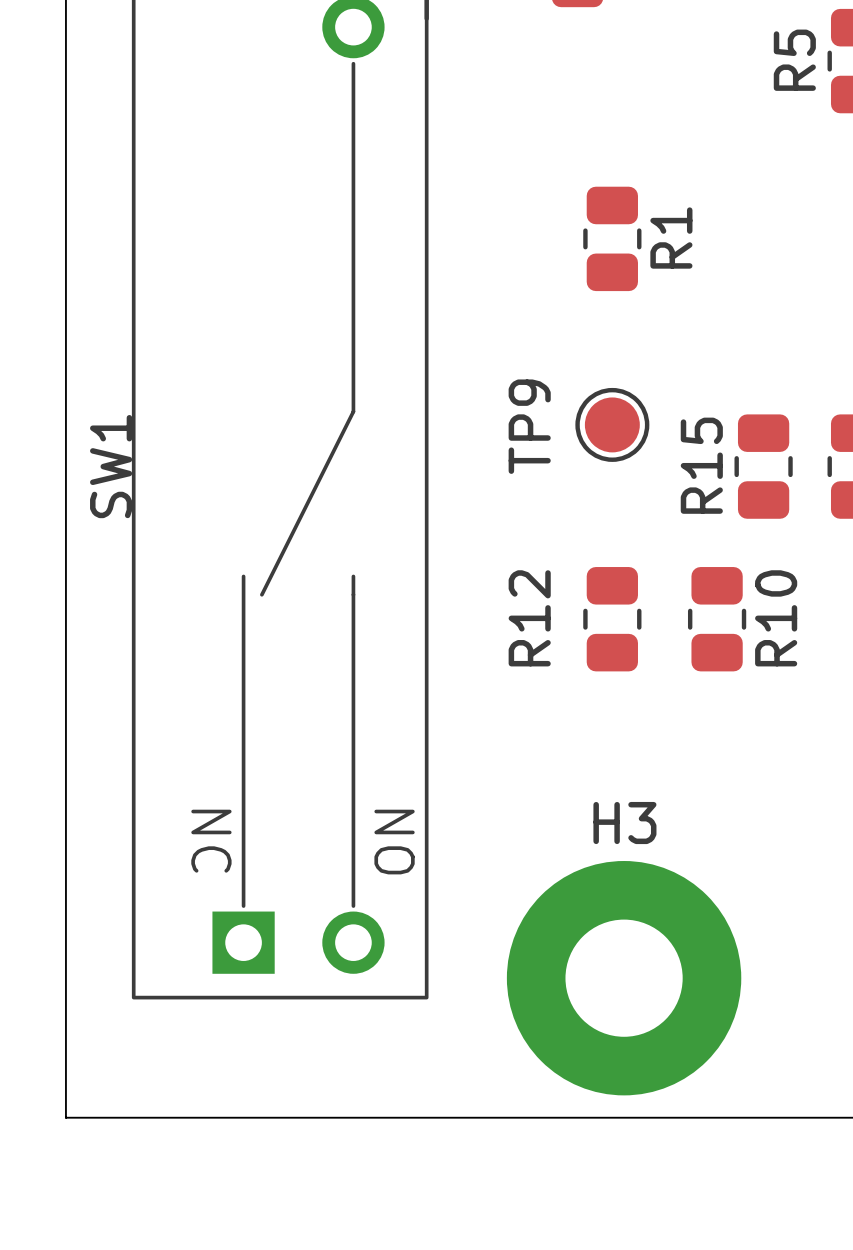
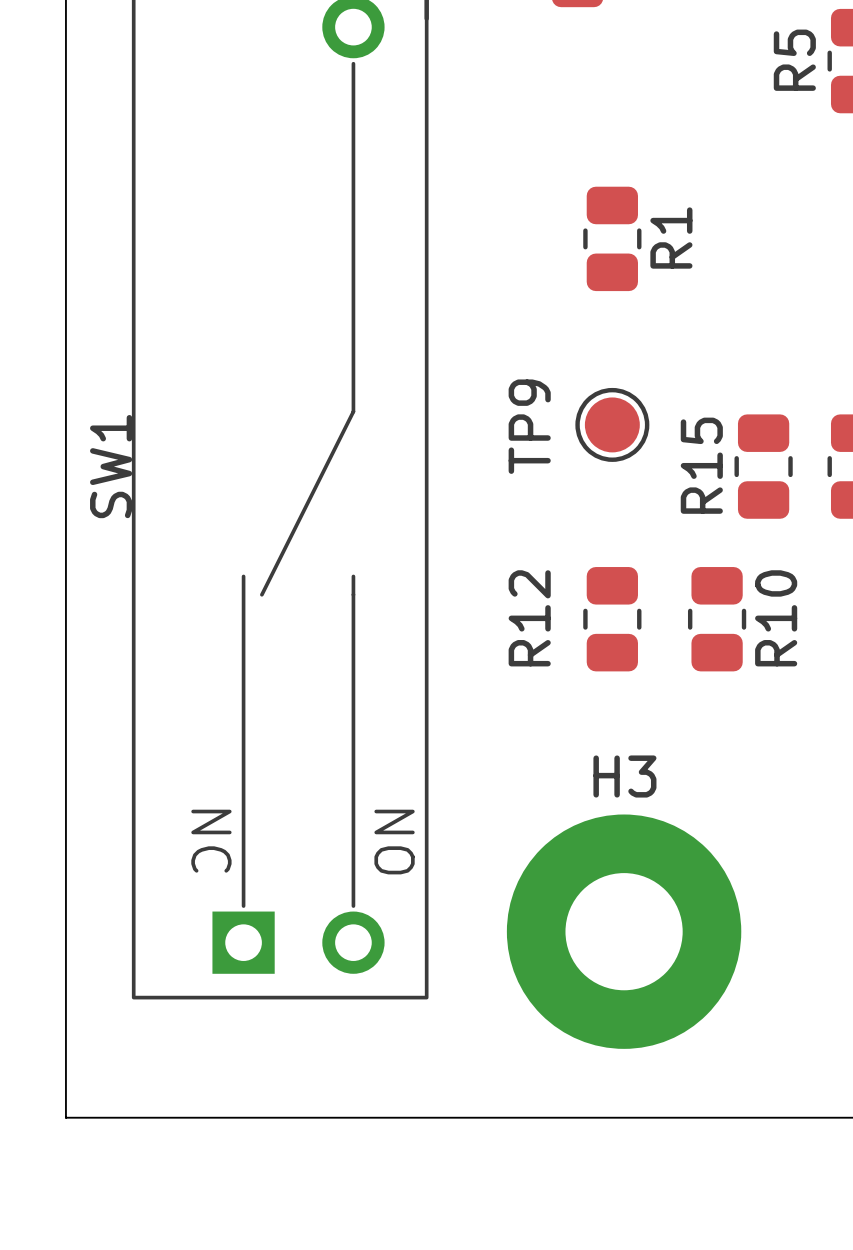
H3 position: (624, 978) -> (624, 931)

